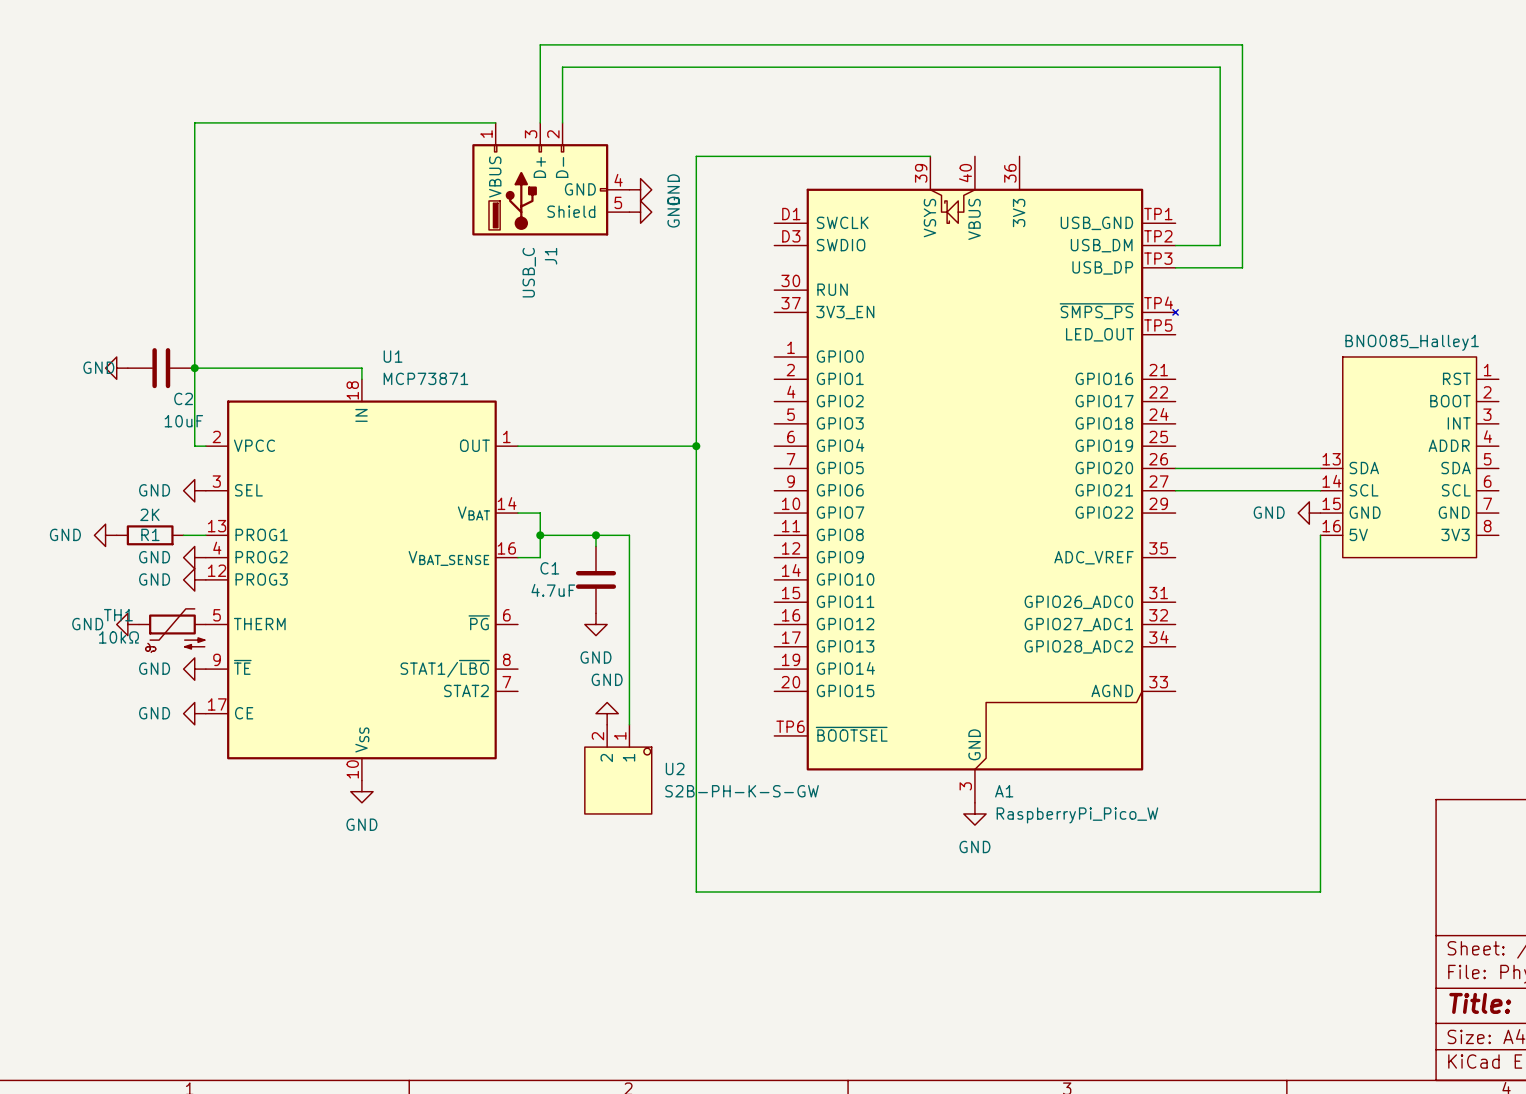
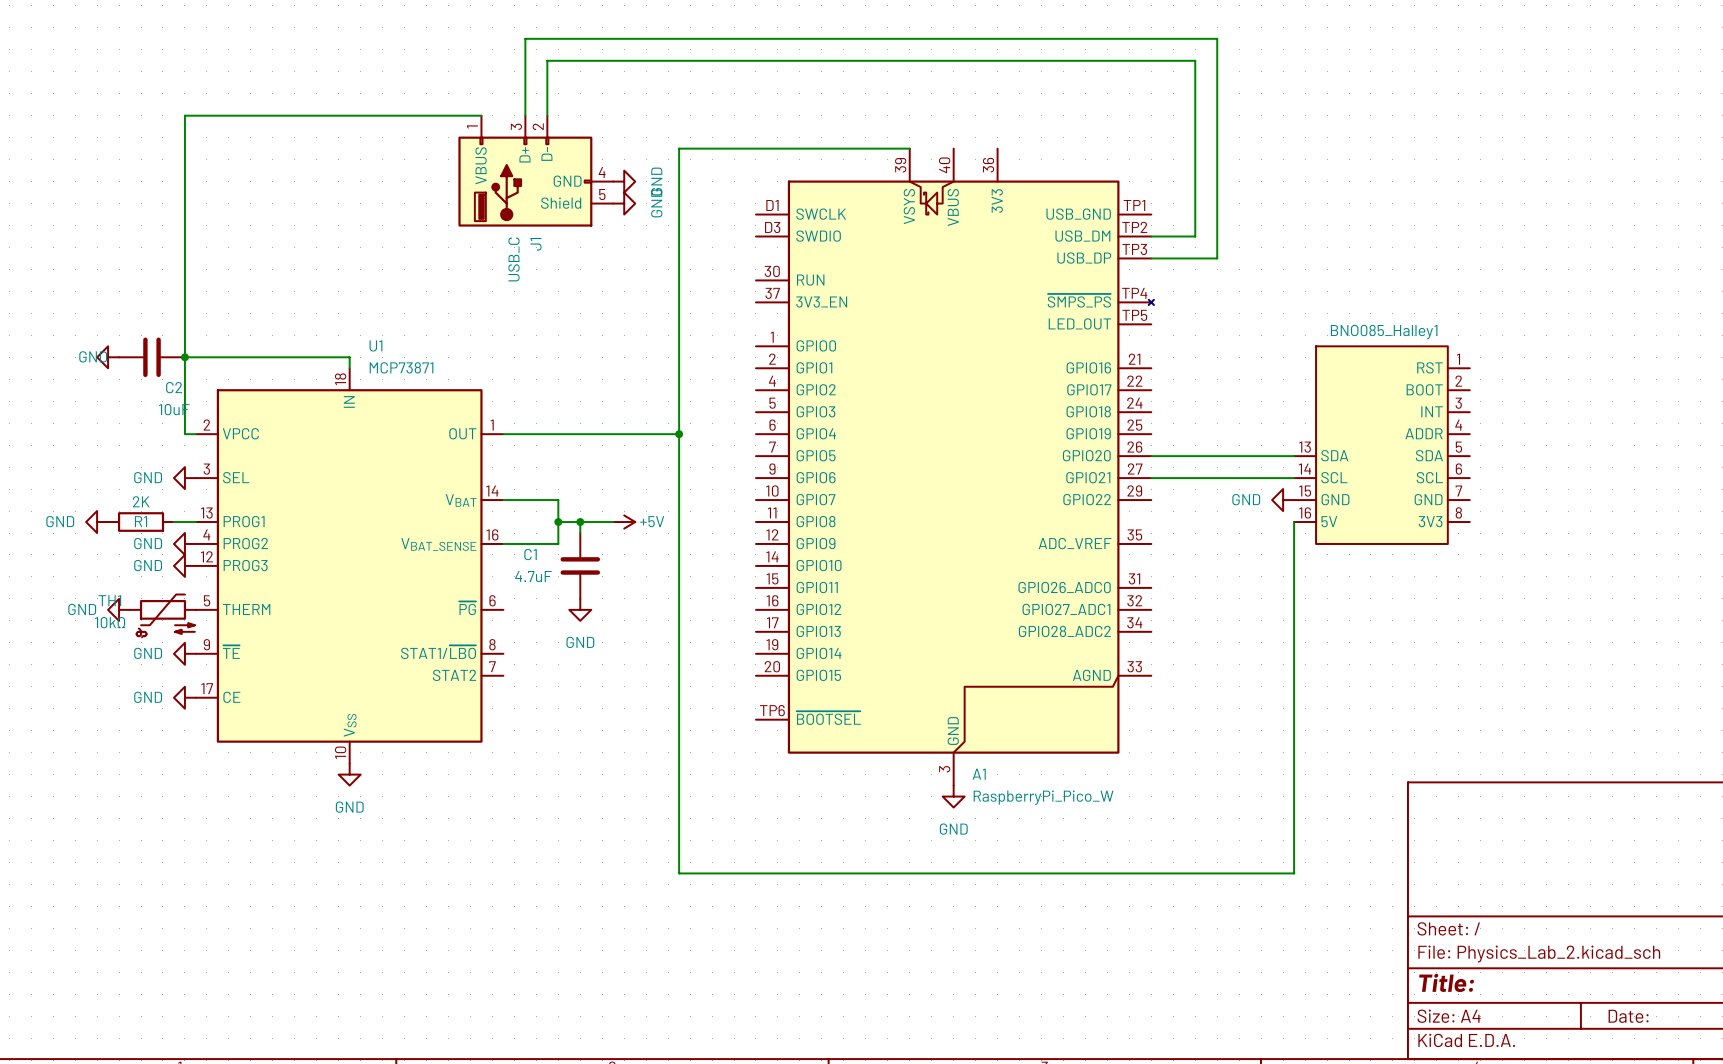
wire: (540, 513) (540, 557) -> (525, 500) (558, 500) (558, 543) (525, 543)
wire: (540, 535) (573, 535) -> none
junction position: (540, 535) -> (558, 522)
wire: (629, 535) (629, 724) -> none
power symbol: none -> +5V (624, 522)
power symbol: GND (607, 713) -> none
U2: S2B-PH-K-S-GW (618, 769) -> none

